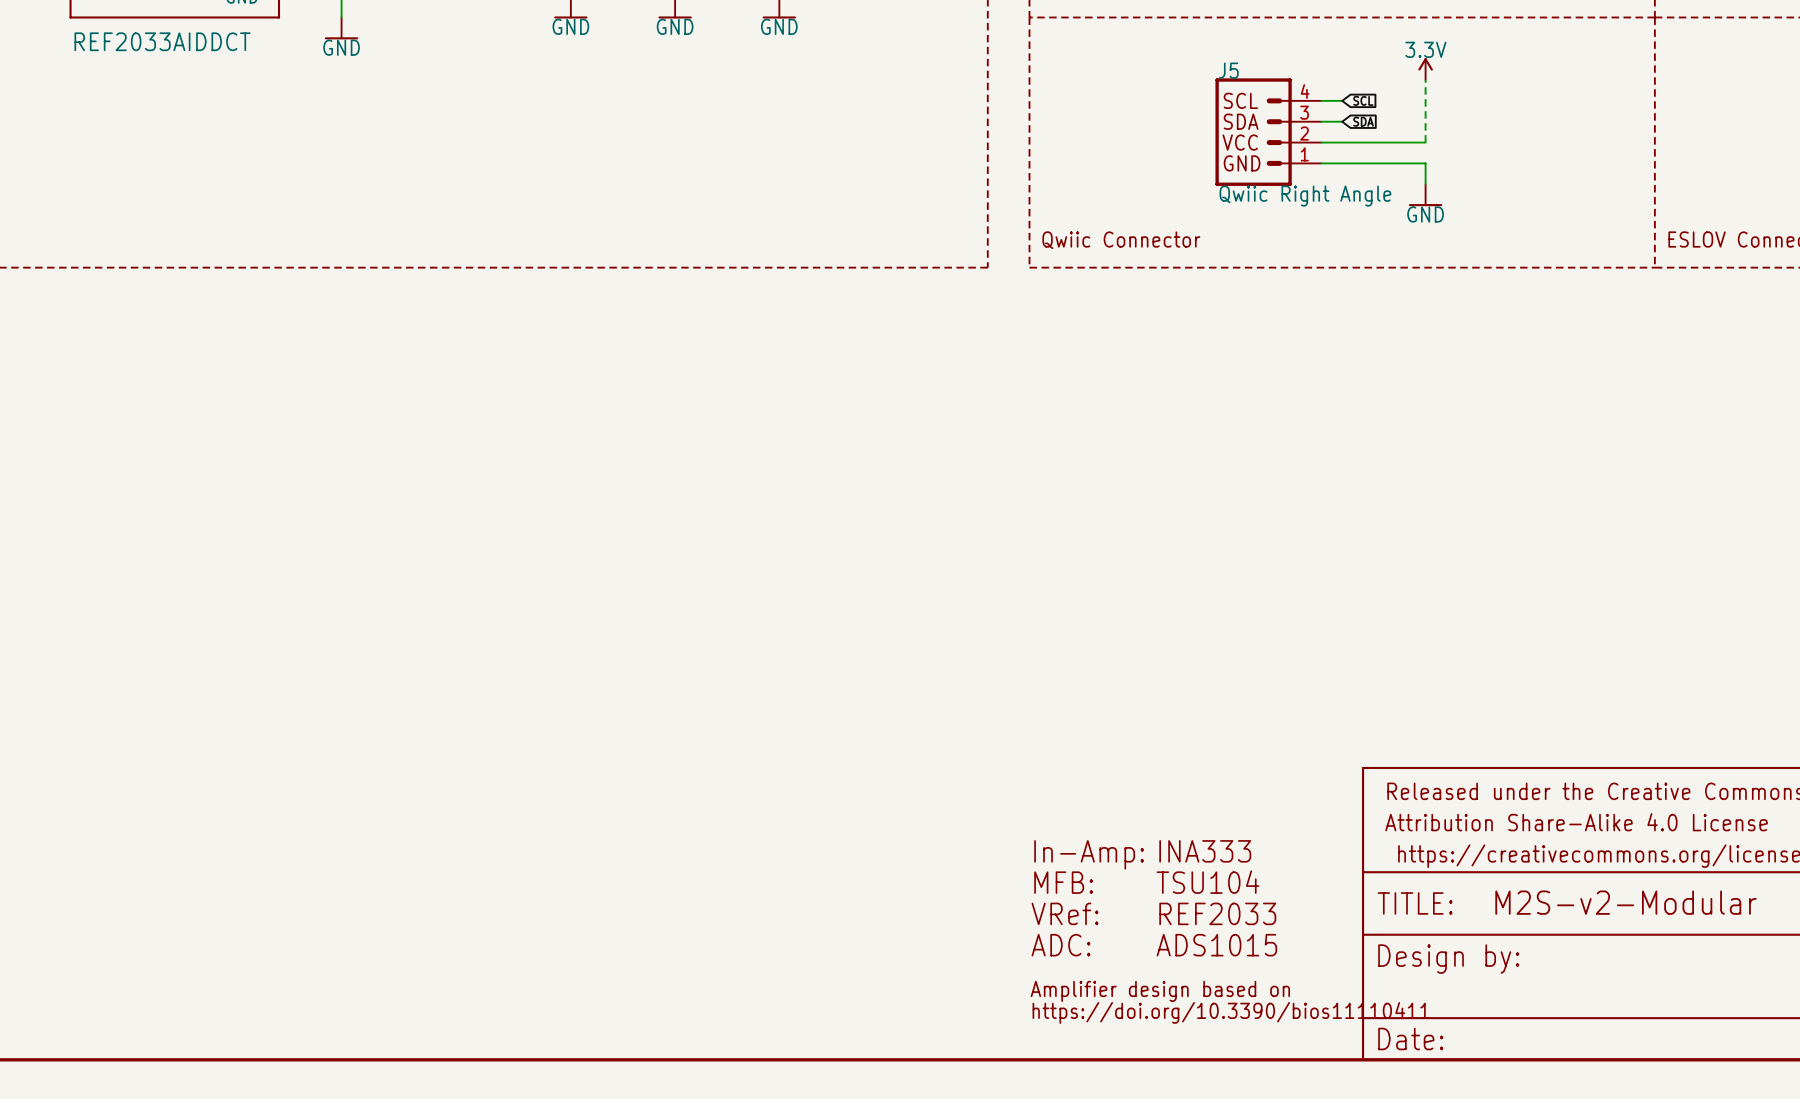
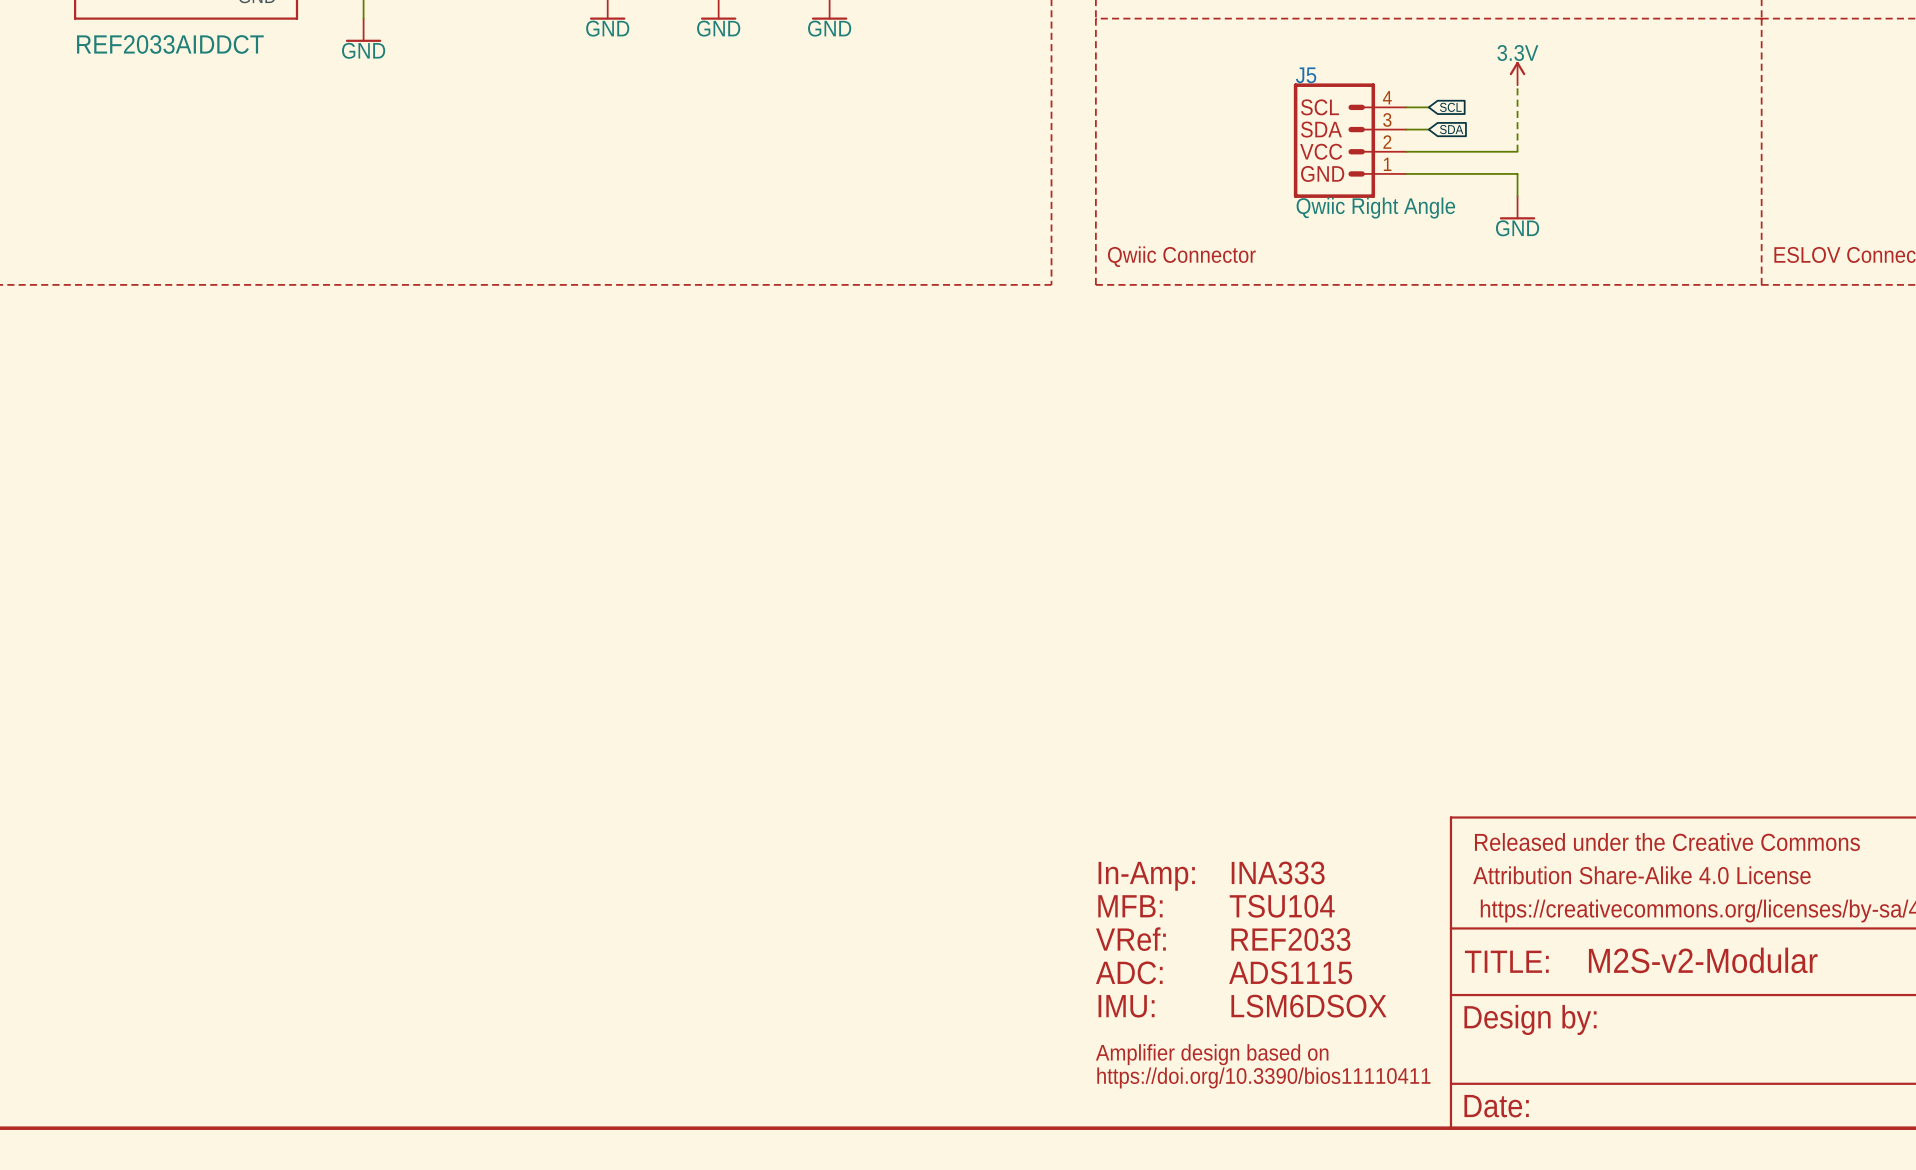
text: none -> INA333 (1278, 872)
text: none -> In-Amp: (1146, 876)
text: INA333 (1205, 851) -> TSU104 (1282, 906)
text: In-Amp: (1089, 854) -> MFB: (1130, 906)
text: MFB: (1063, 882) -> VRef: (1130, 939)
text: TSU104 (1207, 882) -> REF2033 (1290, 939)
text: VRef: (1064, 913) -> ADC: (1129, 972)
text: REF2033 (1217, 913) -> ADS1115 (1290, 972)
text: ADC: (1060, 945) -> IMU: (1126, 1006)
text: ADS1015 (1216, 945) -> LSM6DSOX (1308, 1006)

